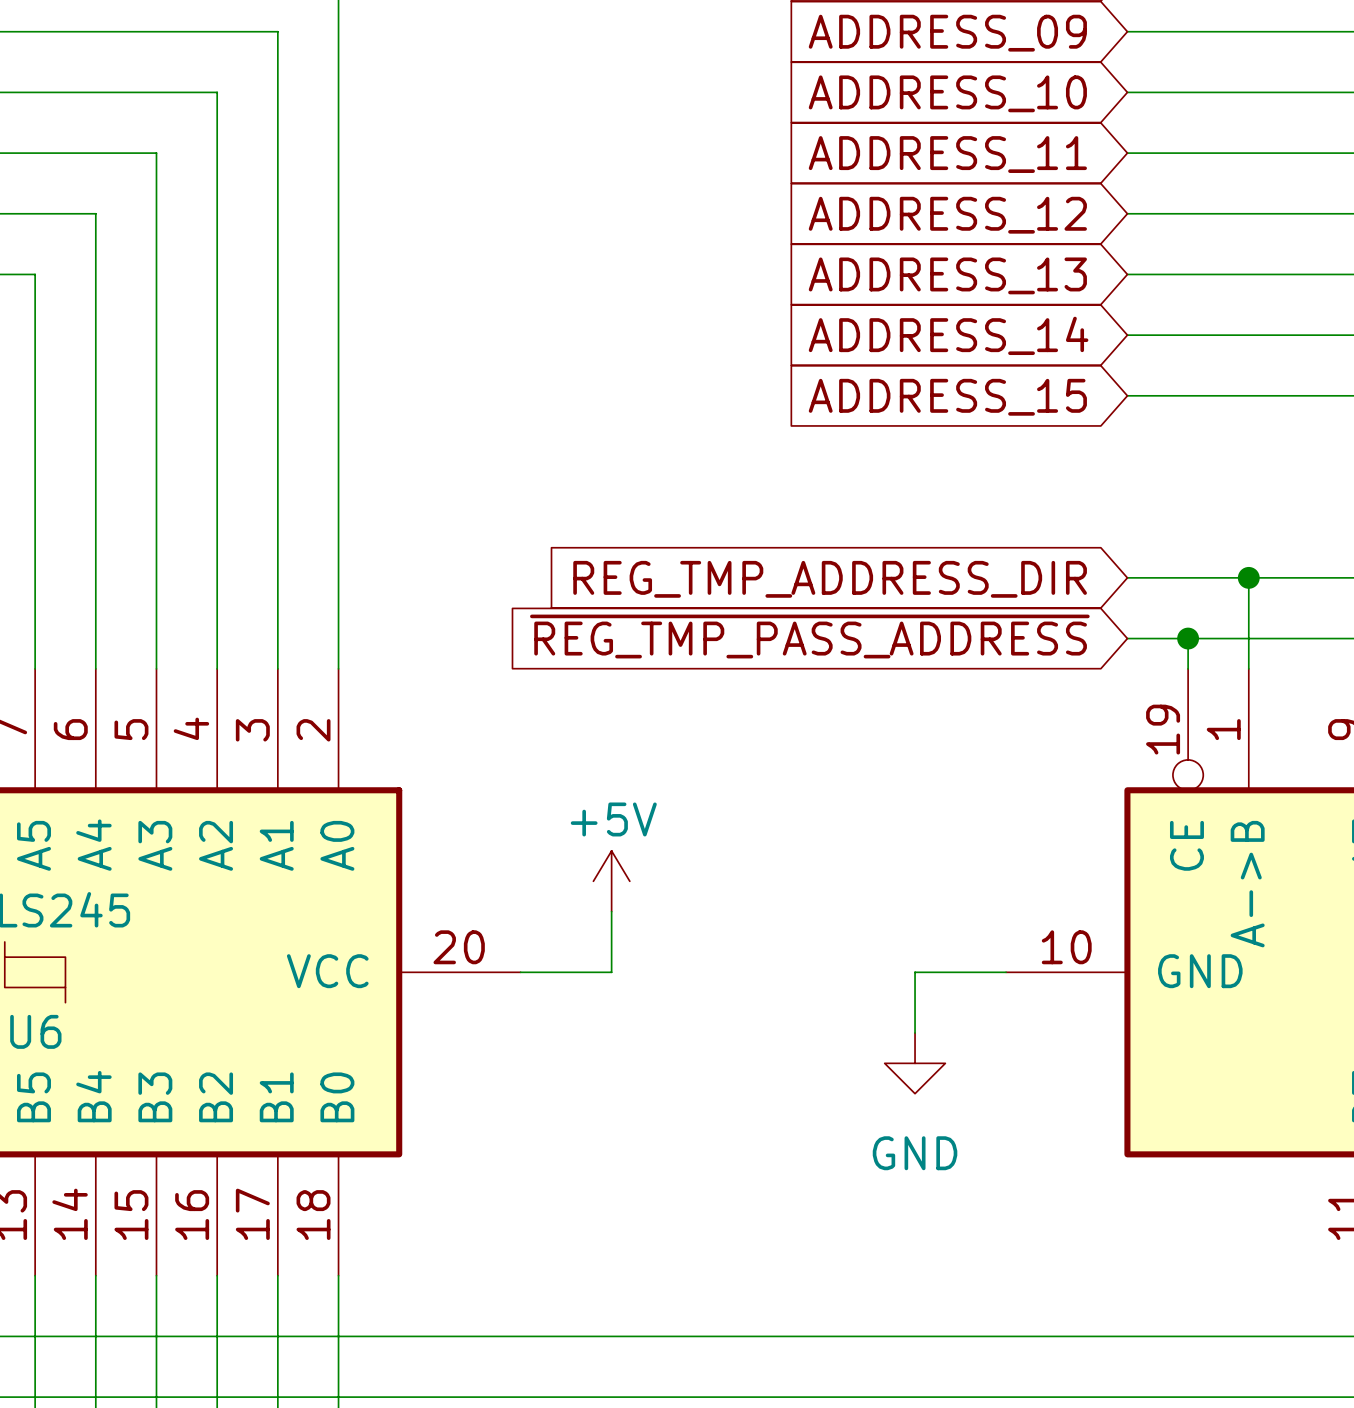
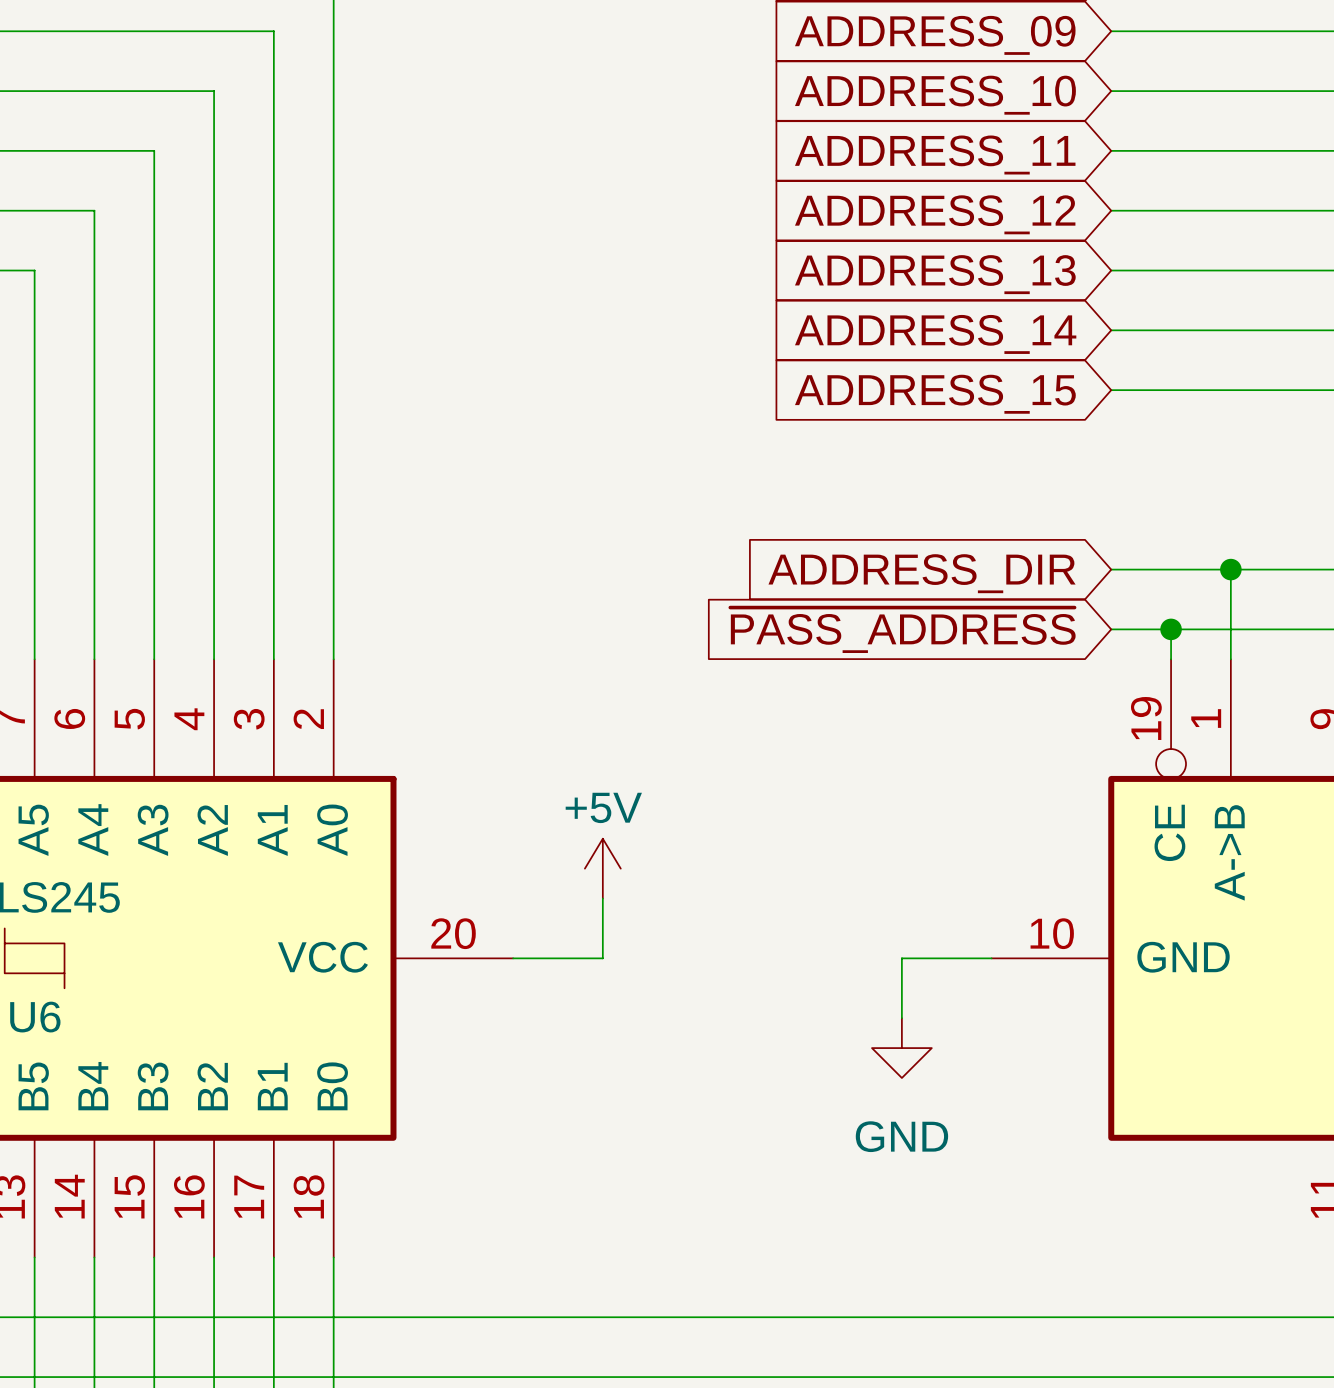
global label: REG_TMP_ADDRESS_DIR (830, 579) -> ADDRESS_DIR (922, 573)
global label: ~{REG_TMP_PASS_ADDRESS} (809, 636) -> ~{PASS_ADDRESS} (902, 630)

